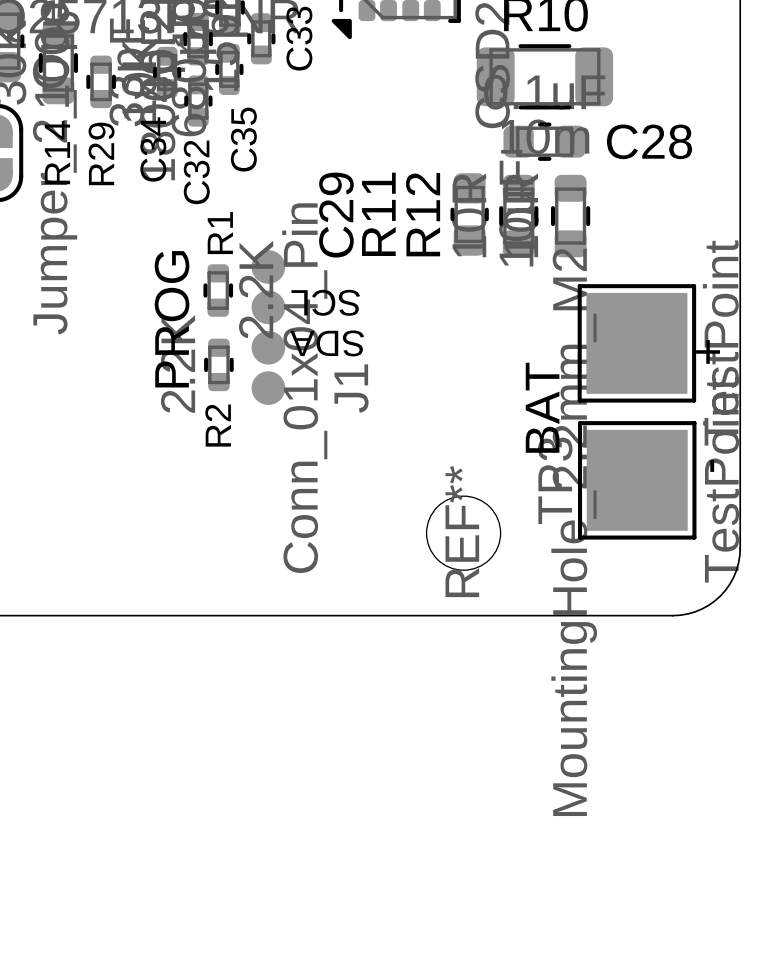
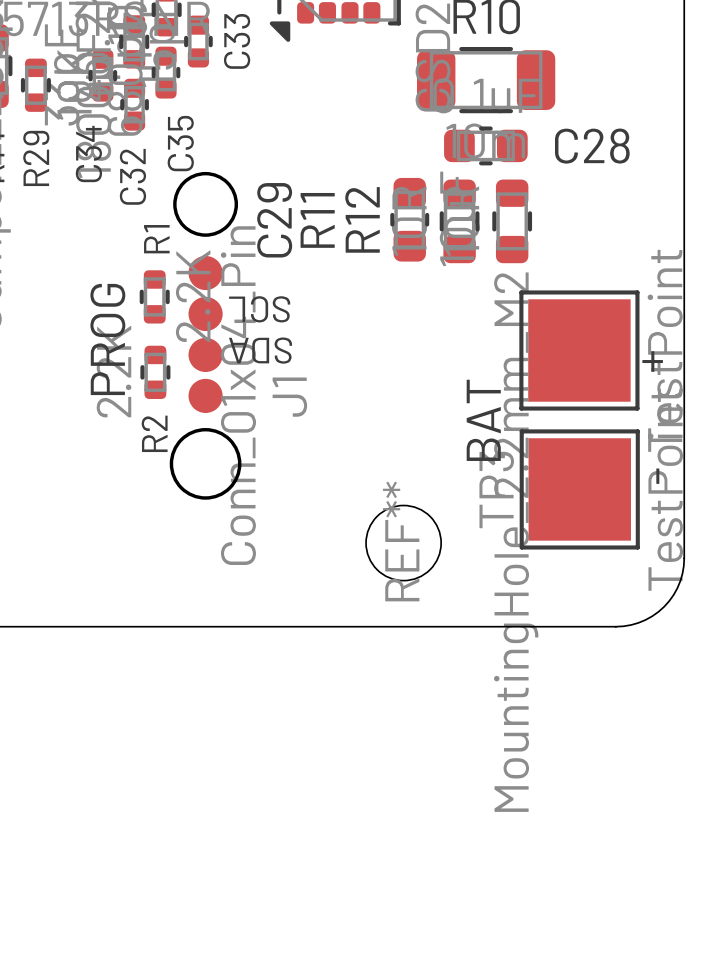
J1 footprint: [251, 250, 286, 405] -> [169, 171, 242, 500]

